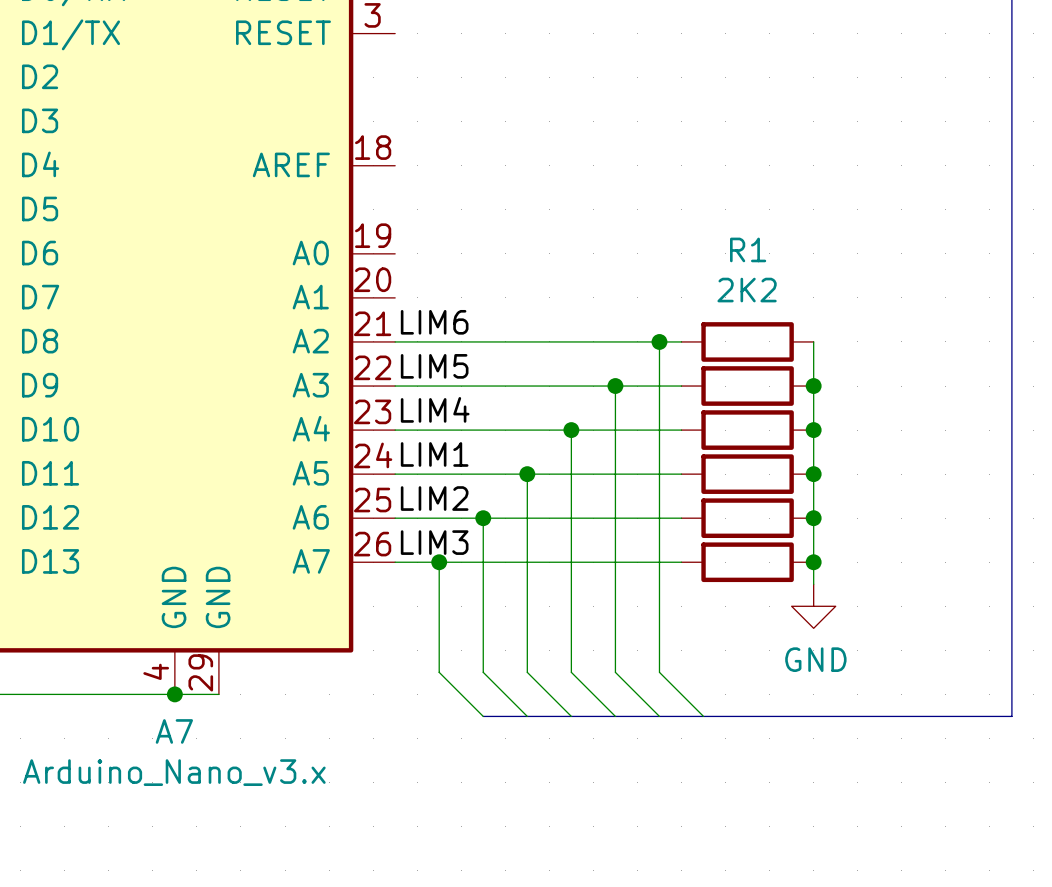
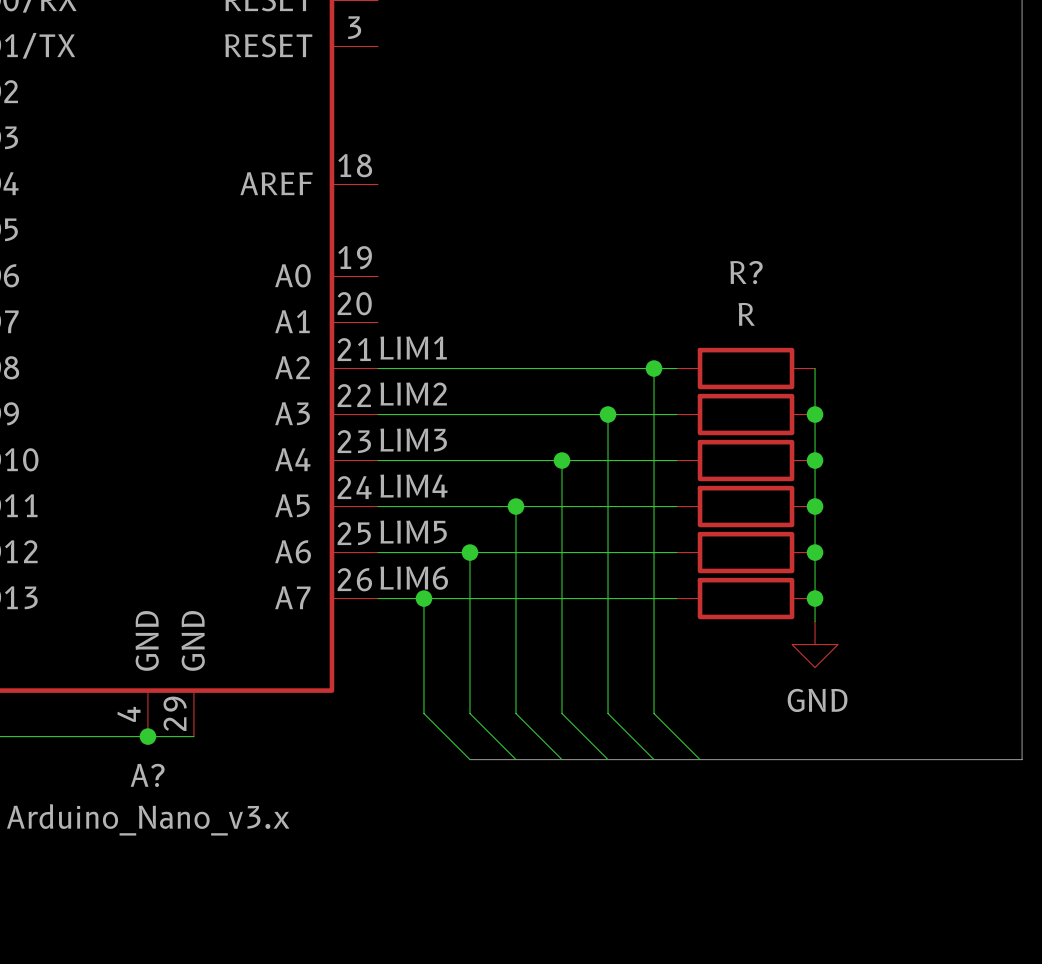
R1 name: R1 (748, 249) -> R? (746, 272)
R1 value: 2K2 (747, 290) -> R (746, 314)
label: LIM6 (434, 322) -> LIM1 (413, 348)
label: LIM5 (434, 366) -> LIM2 (413, 394)
label: LIM4 (435, 409) -> LIM3 (413, 440)
label: LIM1 (434, 454) -> LIM4 (413, 486)
label: LIM2 (434, 498) -> LIM5 (413, 532)
label: LIM3 (434, 542) -> LIM6 (414, 578)
A7 name: A7 (174, 731) -> A? (147, 775)

